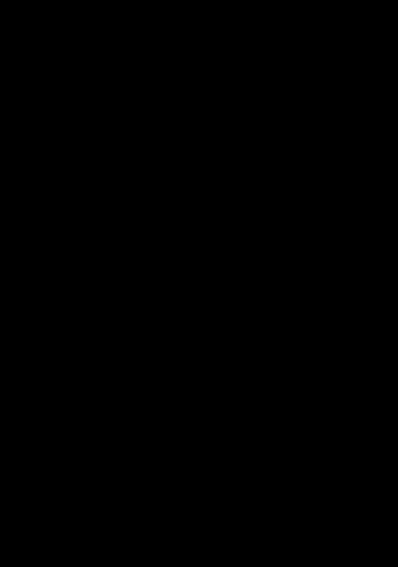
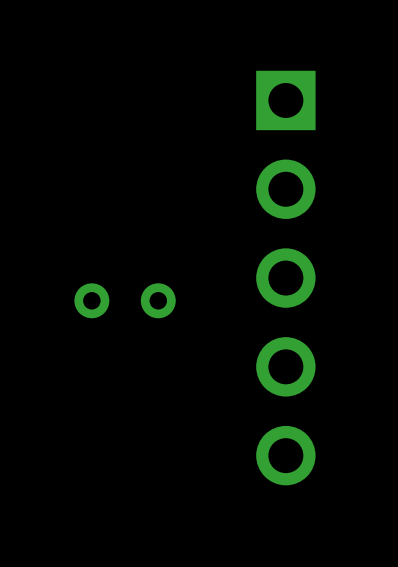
part: none -> (285, 278)
part: none -> (125, 300)

